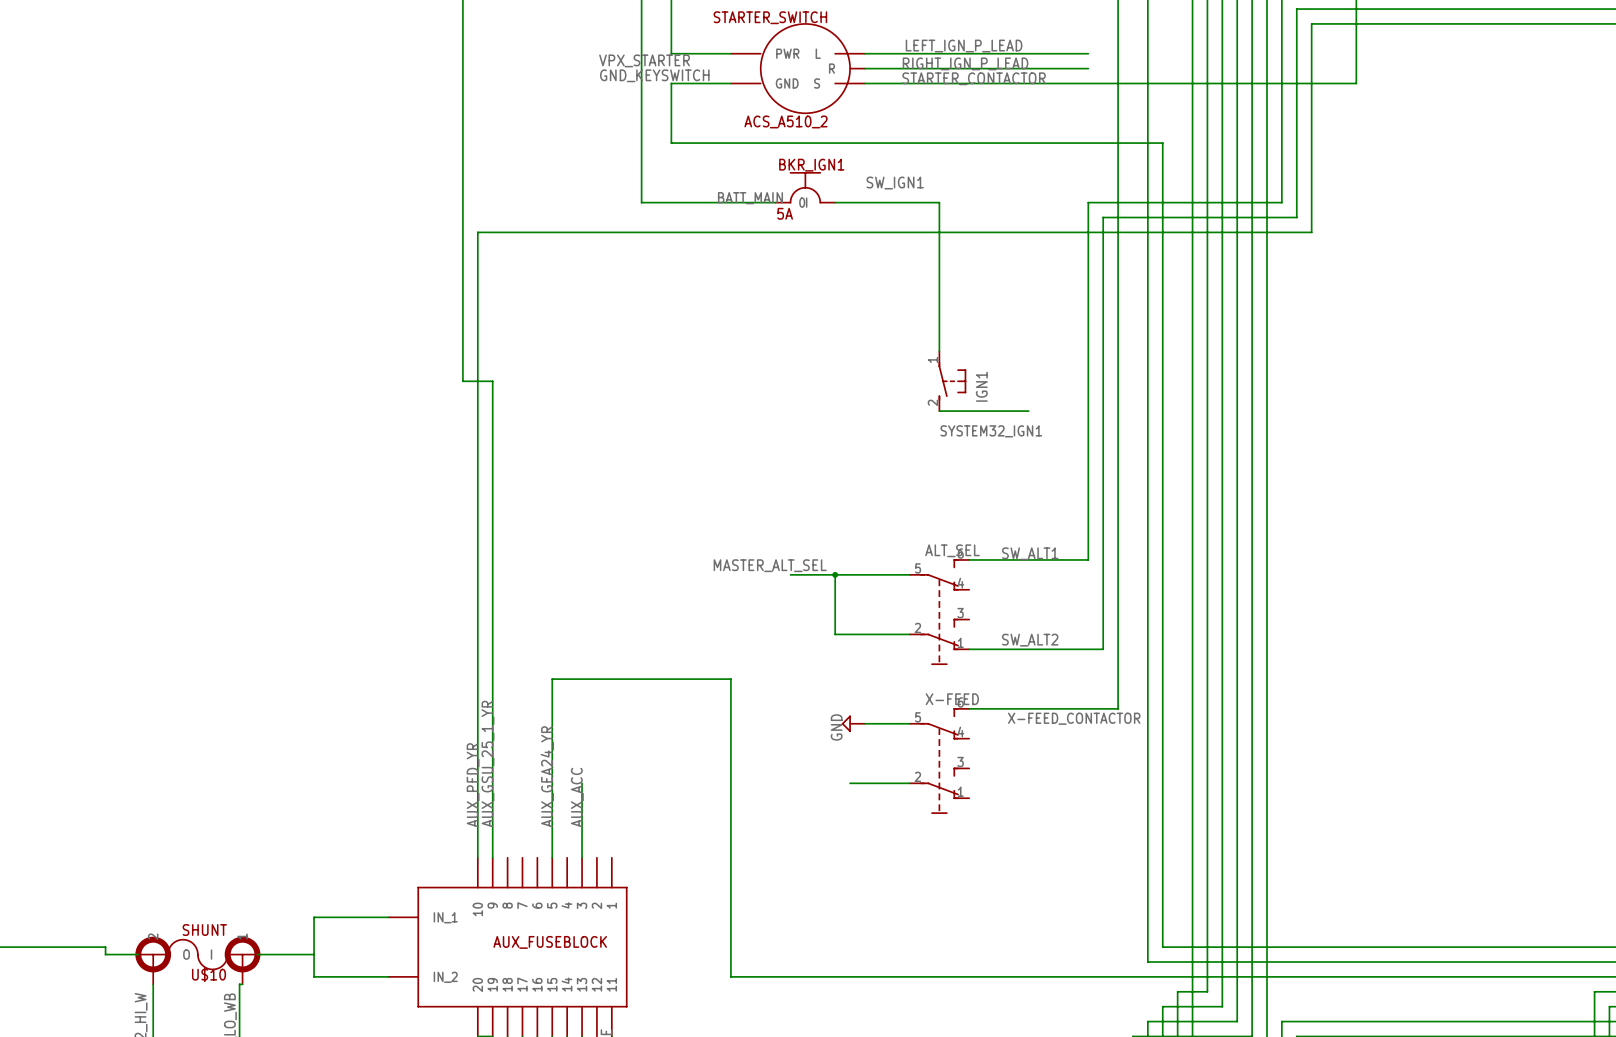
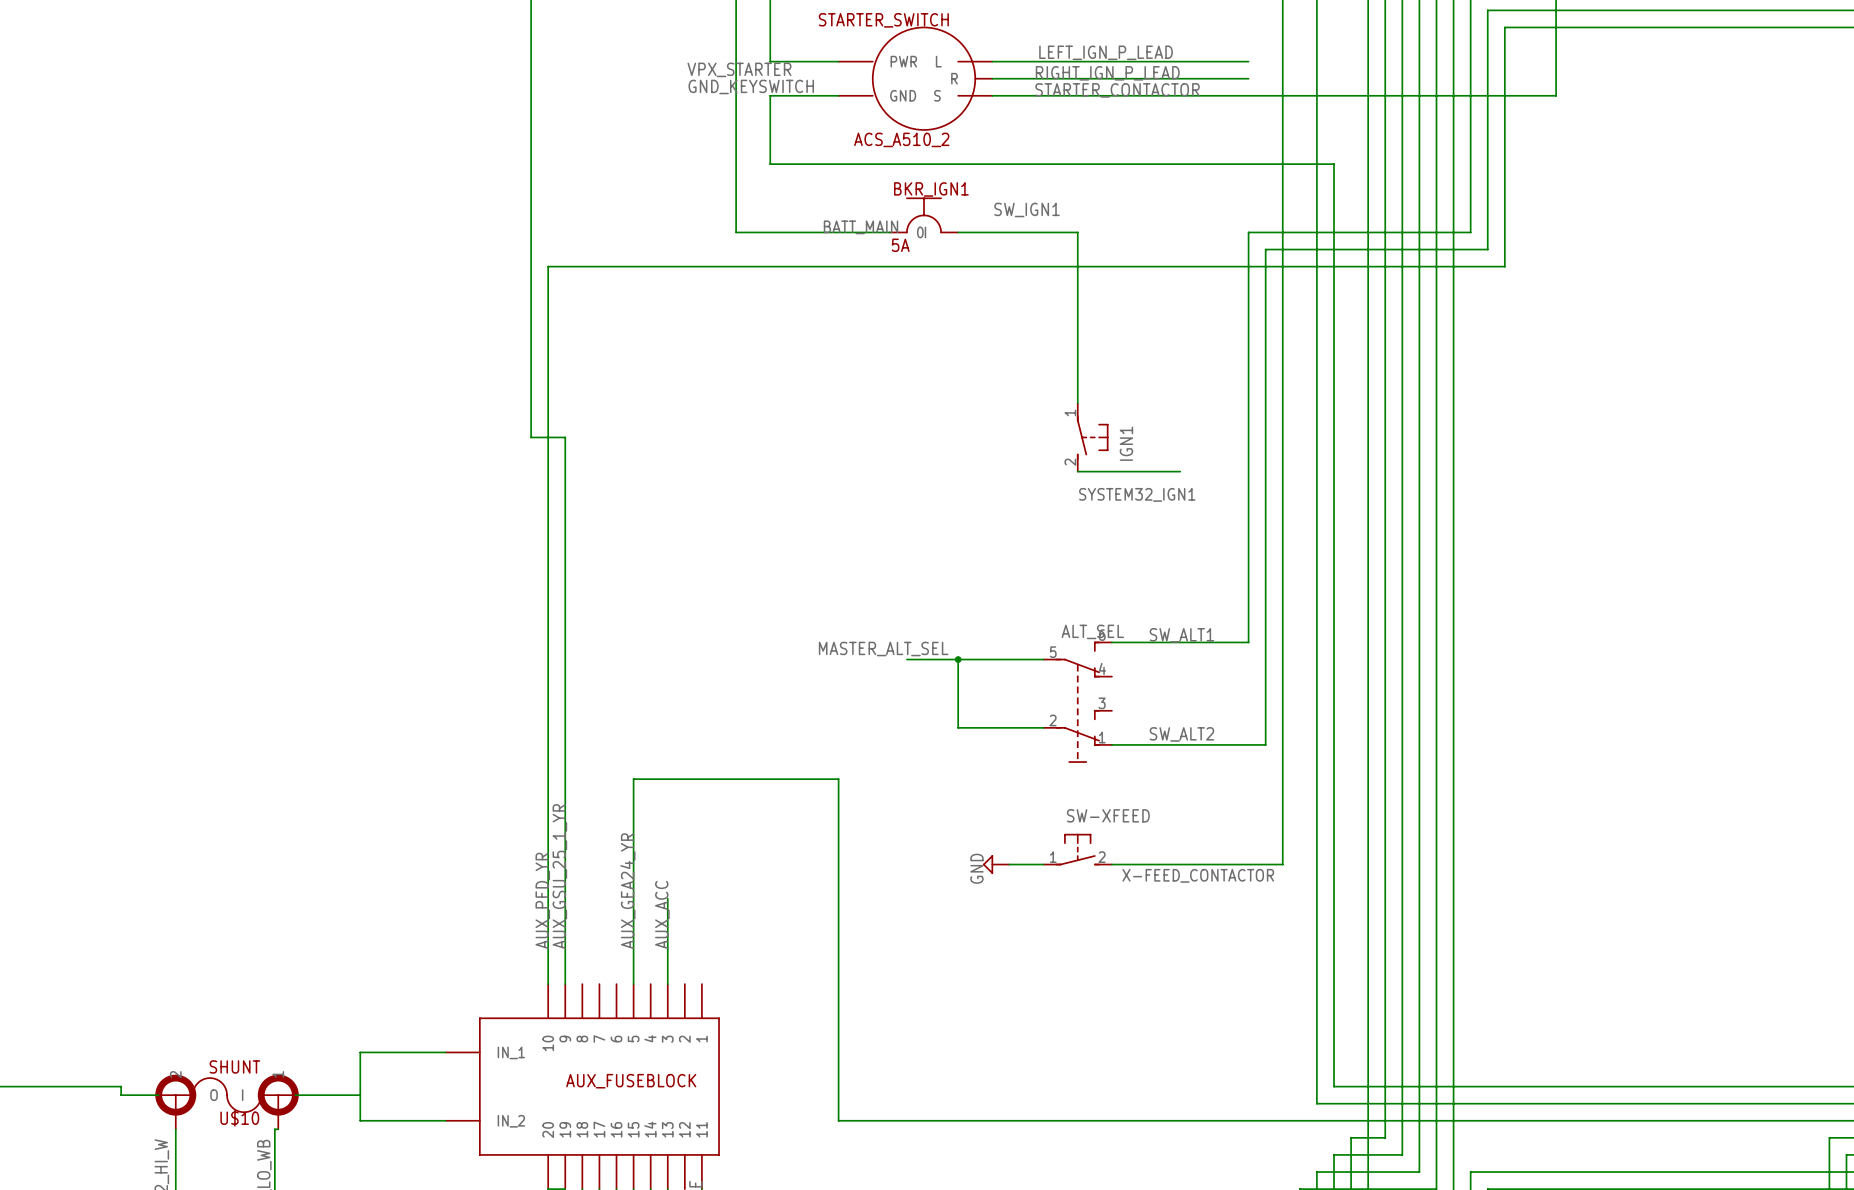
wire: (969, 708) (1118, 708) -> (1111, 864) (1282, 864) (1282, 813)
label position: X-FEED_CONTACTOR (1074, 718) -> X-FEED_CONTACTOR (1198, 875)
power symbol position: GND (853, 723) -> GND (996, 864)
wire: (864, 723) (909, 723) -> none
SW-XFEED: none -> (1077, 849)
wire: none -> (1009, 864) (1043, 864)
X-FEED: (939, 760) -> none
wire: (850, 783) (909, 783) -> none

